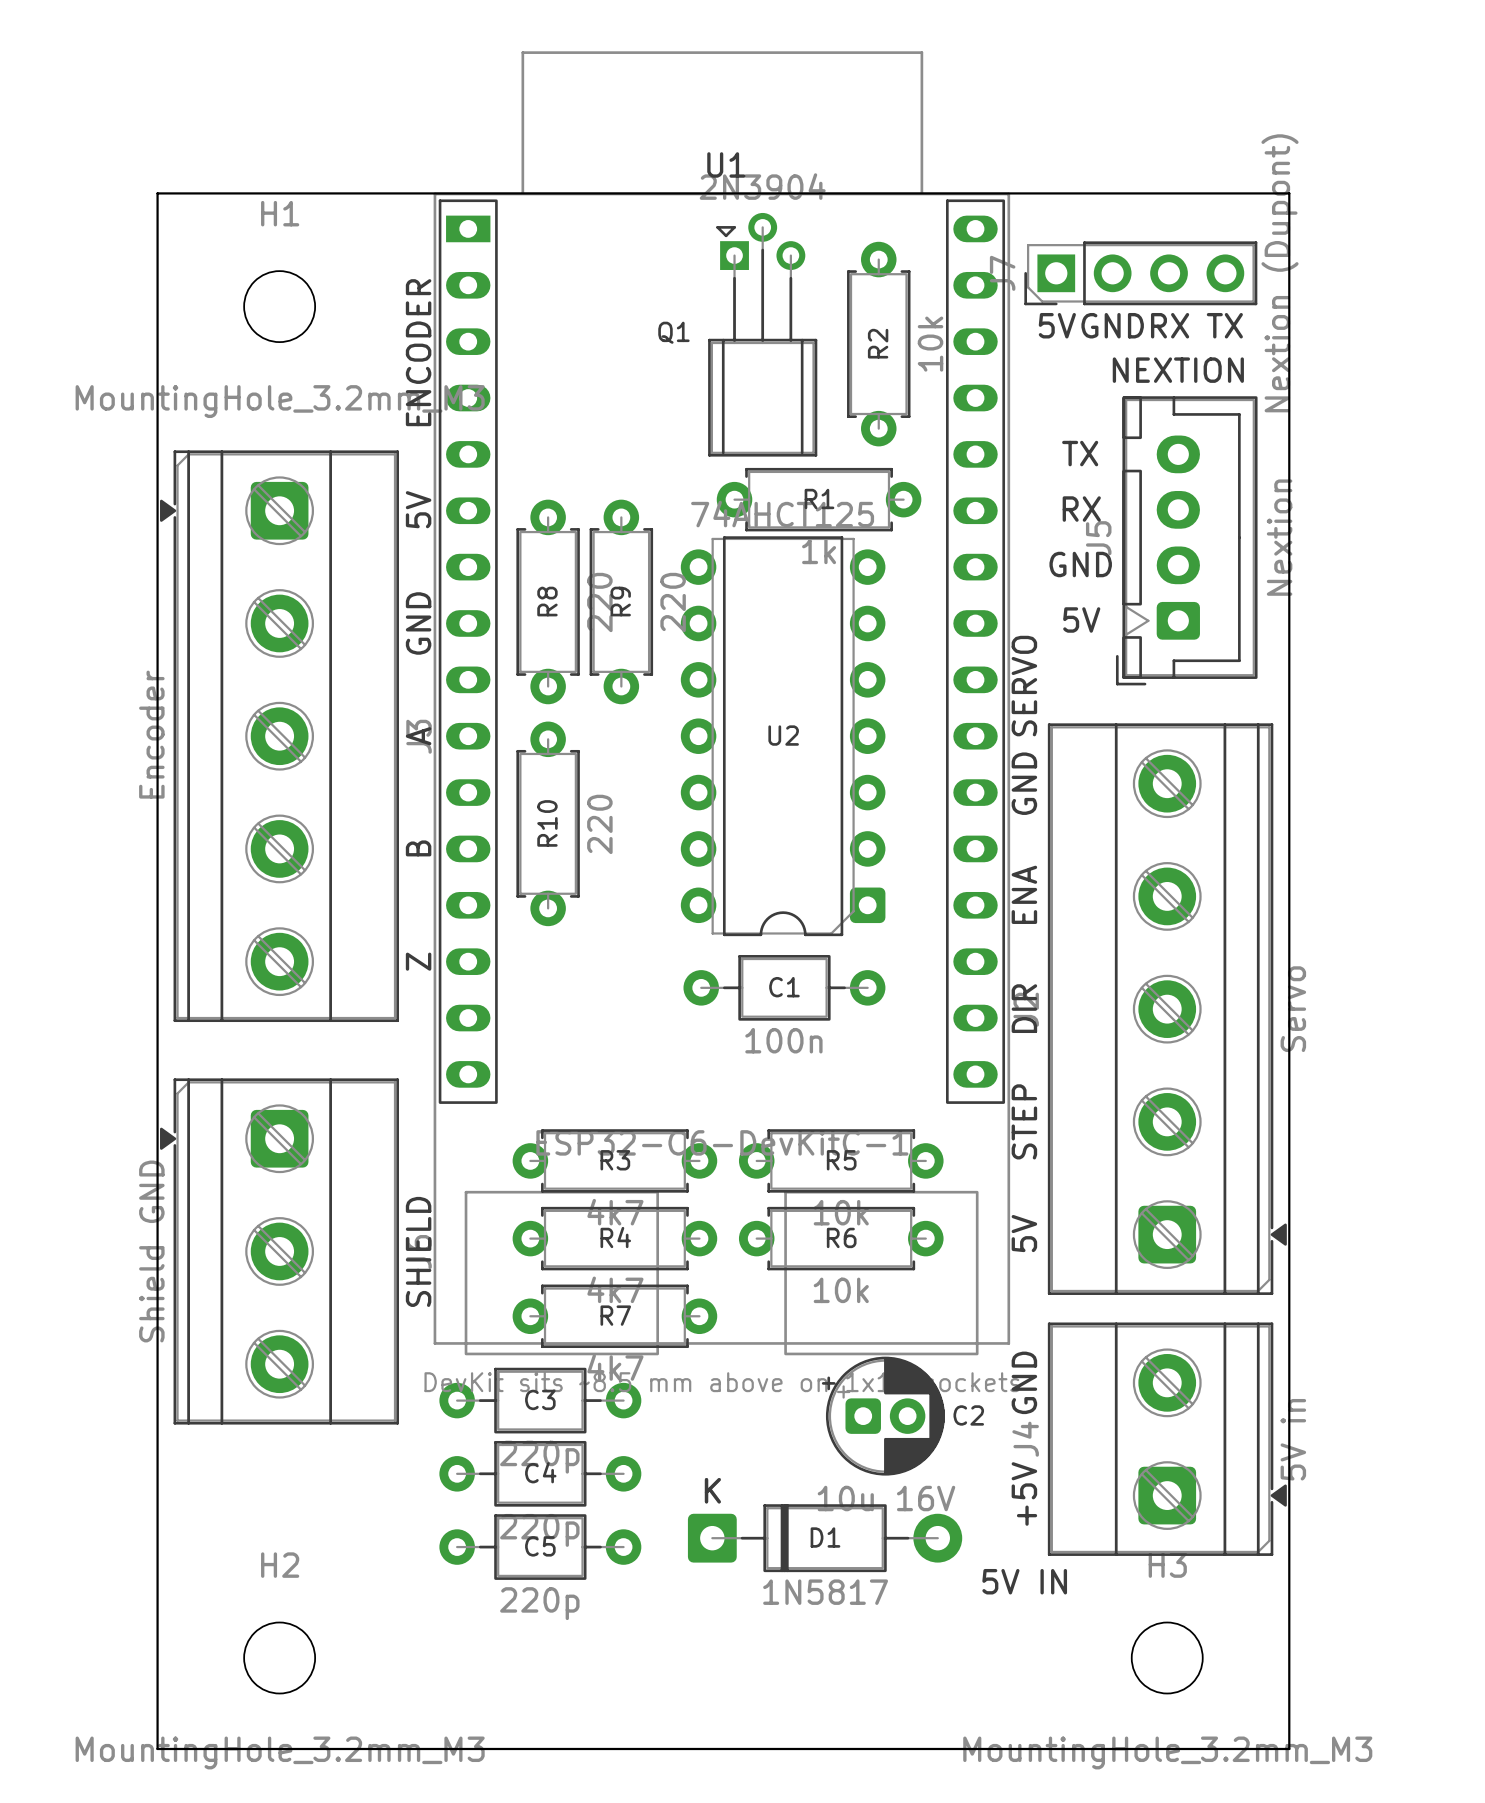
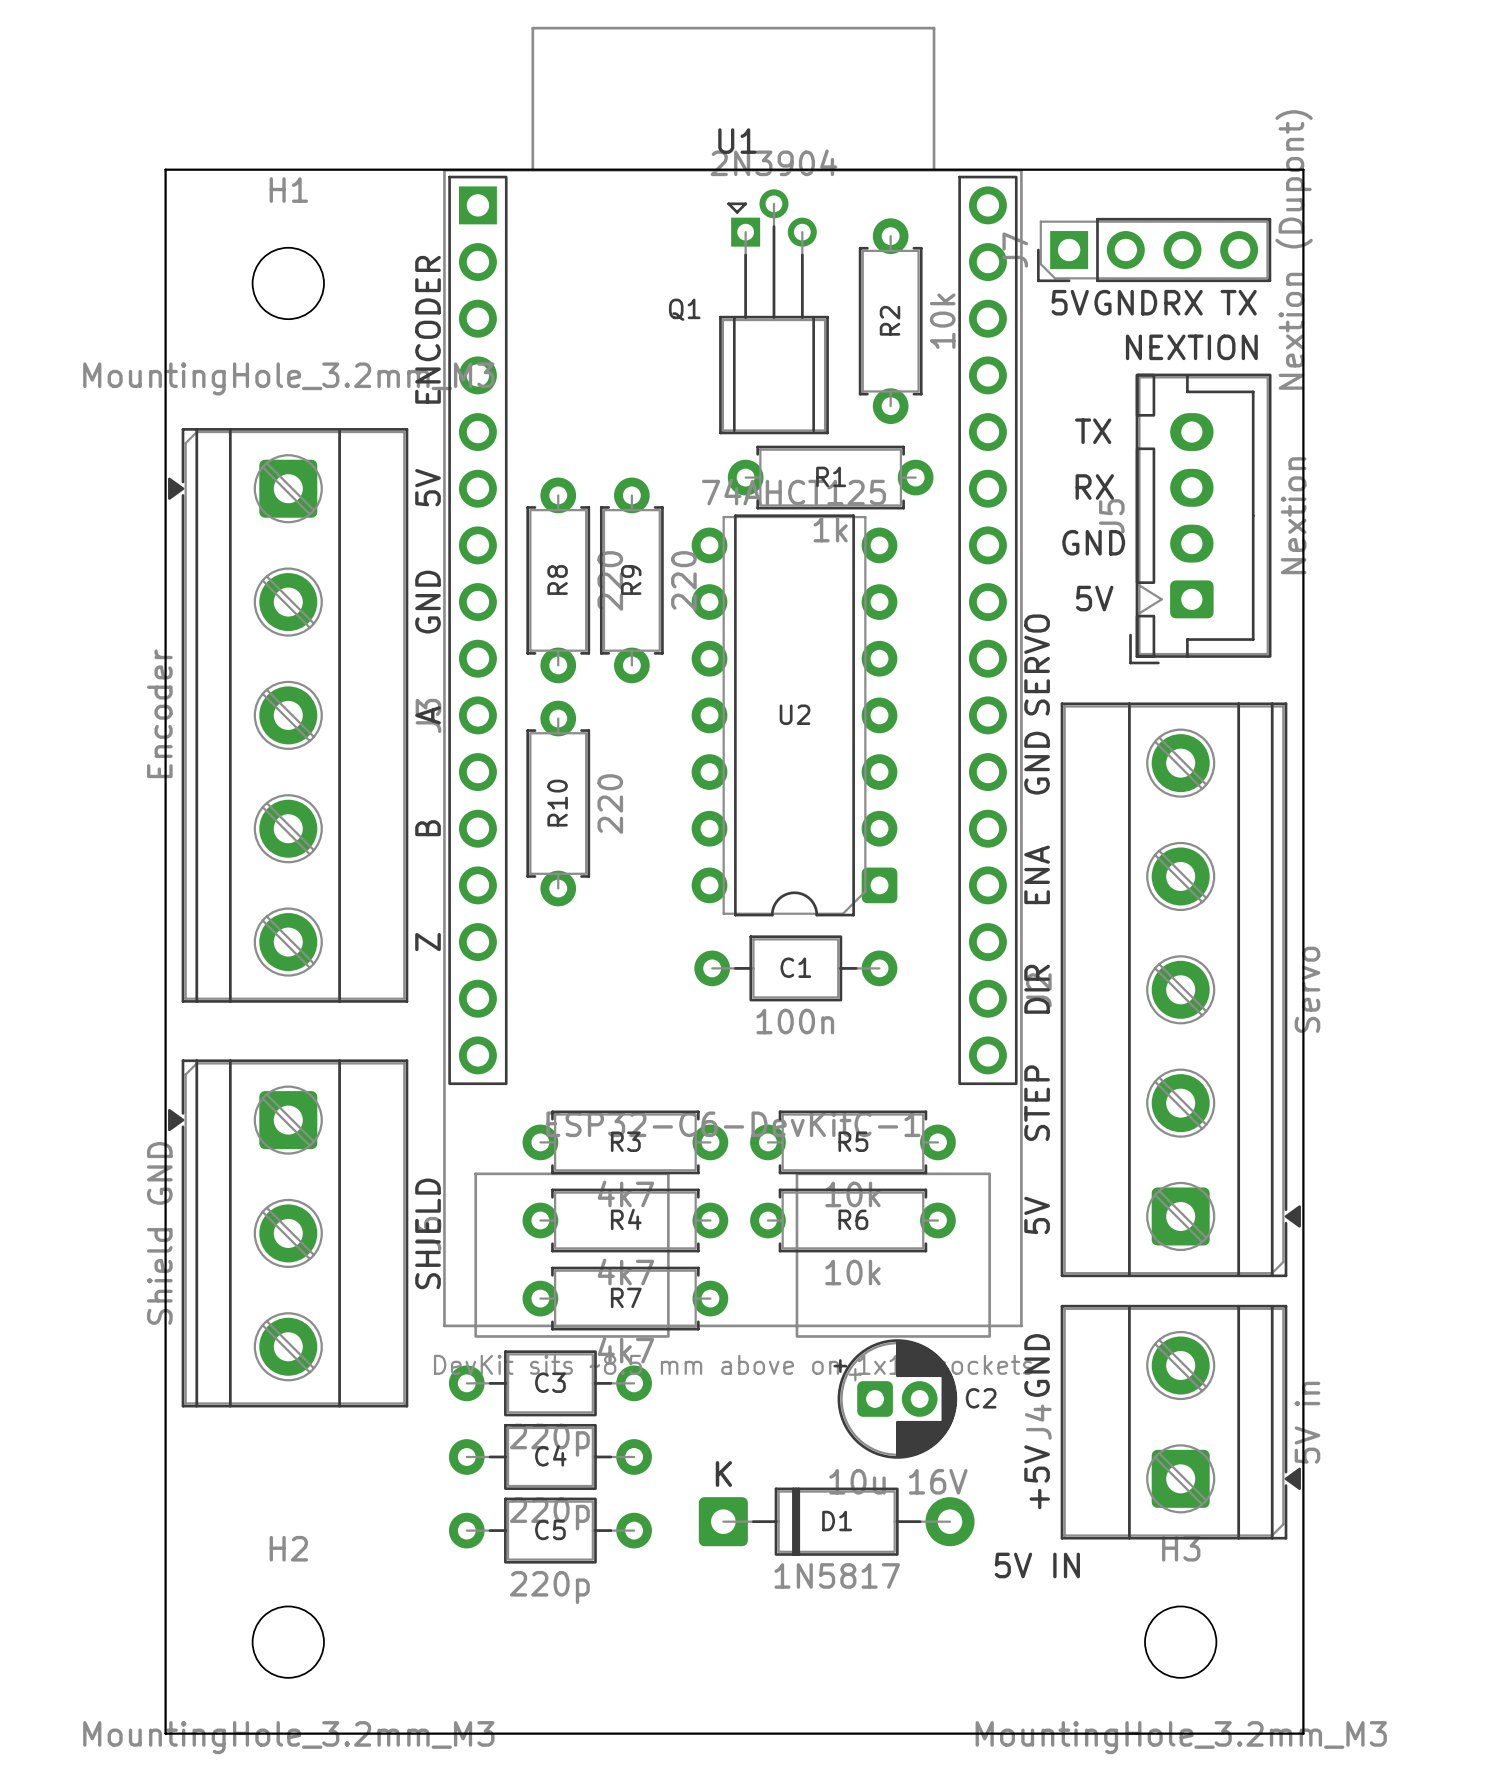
U1 footprint: [433, 51, 1011, 1356] -> [443, 26, 1023, 1338]

